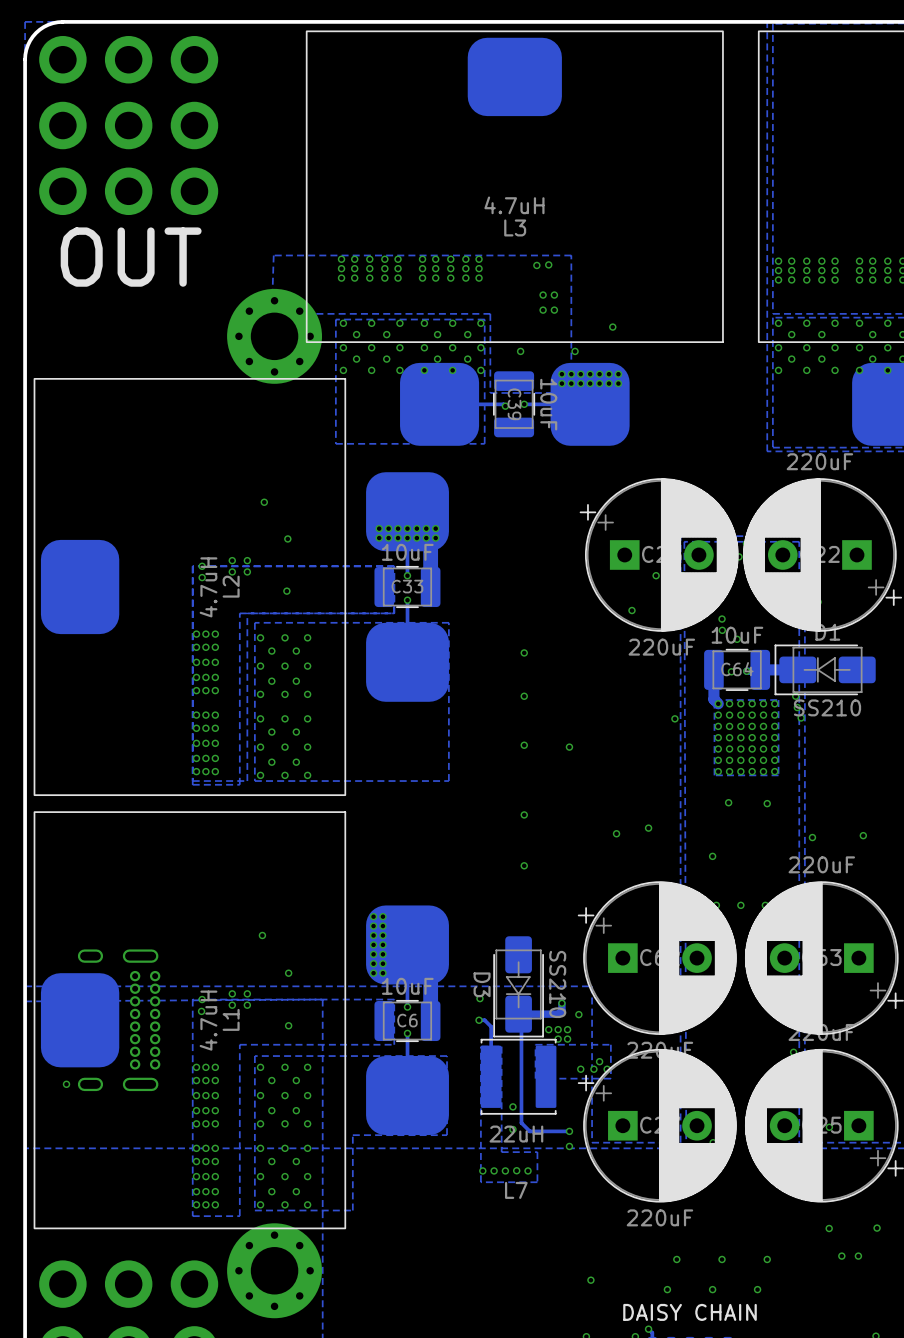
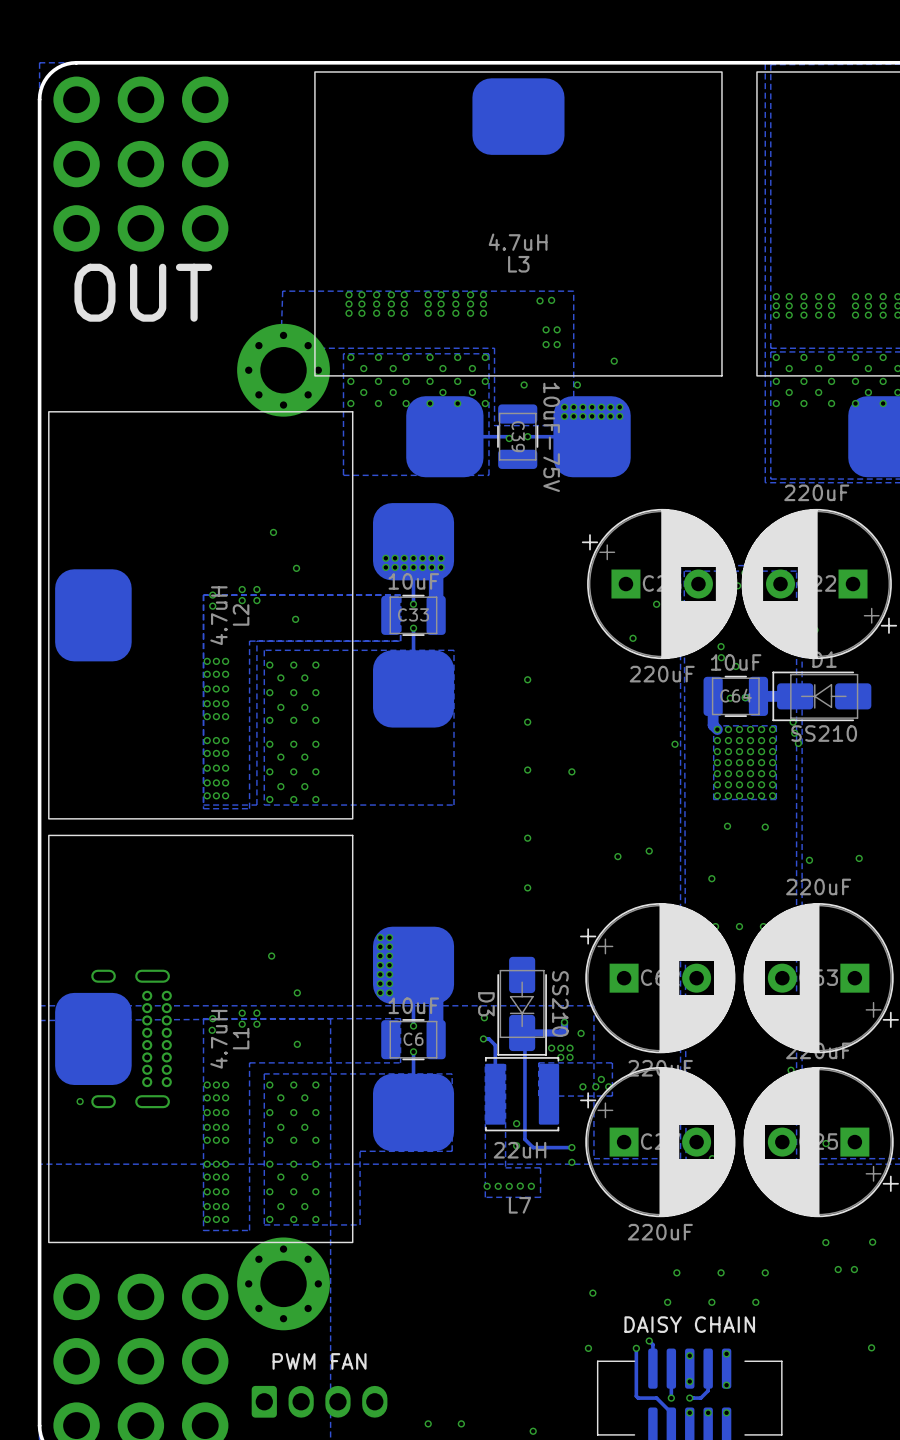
C39 value: 10uF (548, 404) -> 10uF-75V (551, 437)

